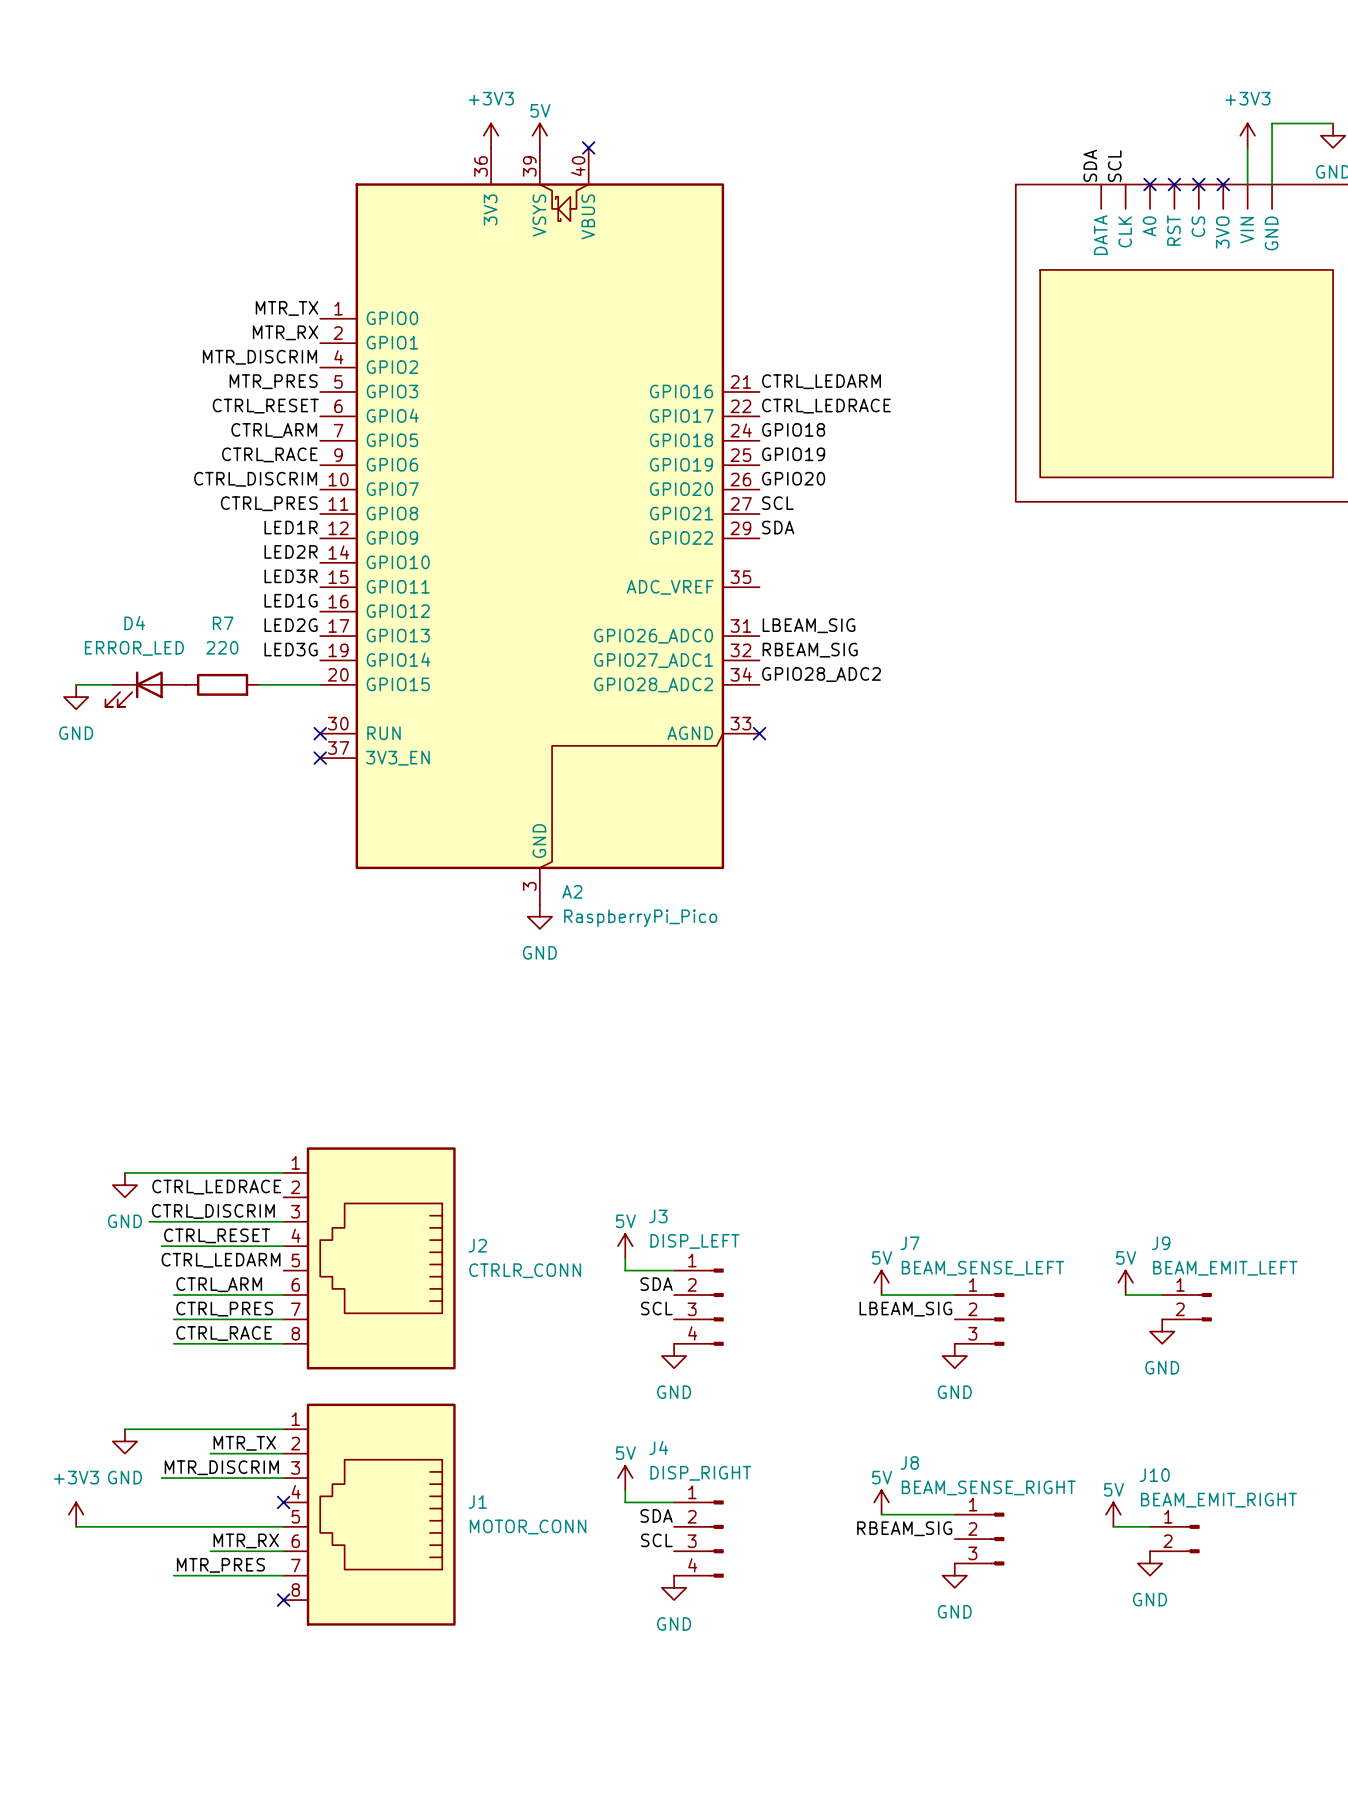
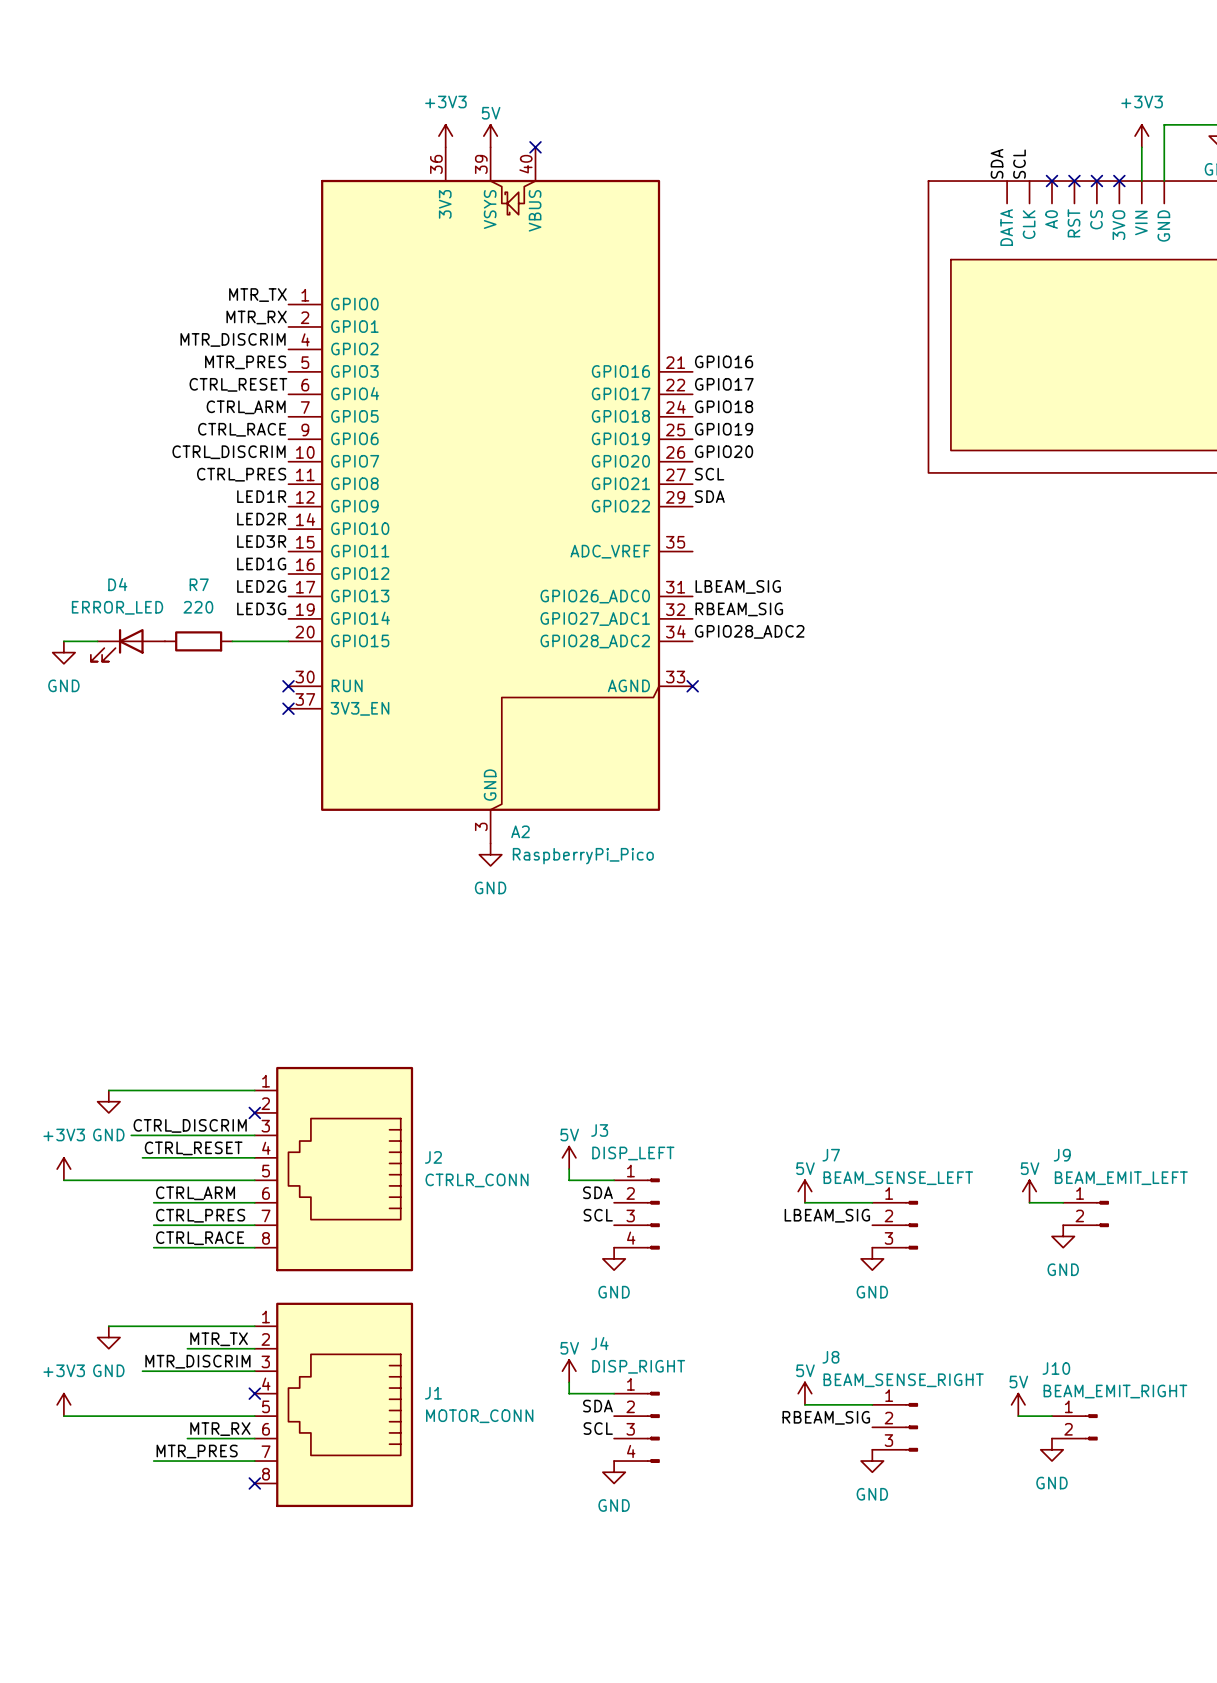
label: CTRL_LEDARM (821, 381) -> GPIO16 (724, 361)
label: CTRL_LEDRACE (826, 406) -> GPIO17 (724, 384)
label: CTRL_LEDRACE (216, 1187) -> none
no-connect mark: none -> (254, 1112)
power symbol: none -> +3V3 (63, 1169)
label: CTRL_LEDARM (221, 1260) -> none
wire: none -> (63, 1180) (254, 1180)

